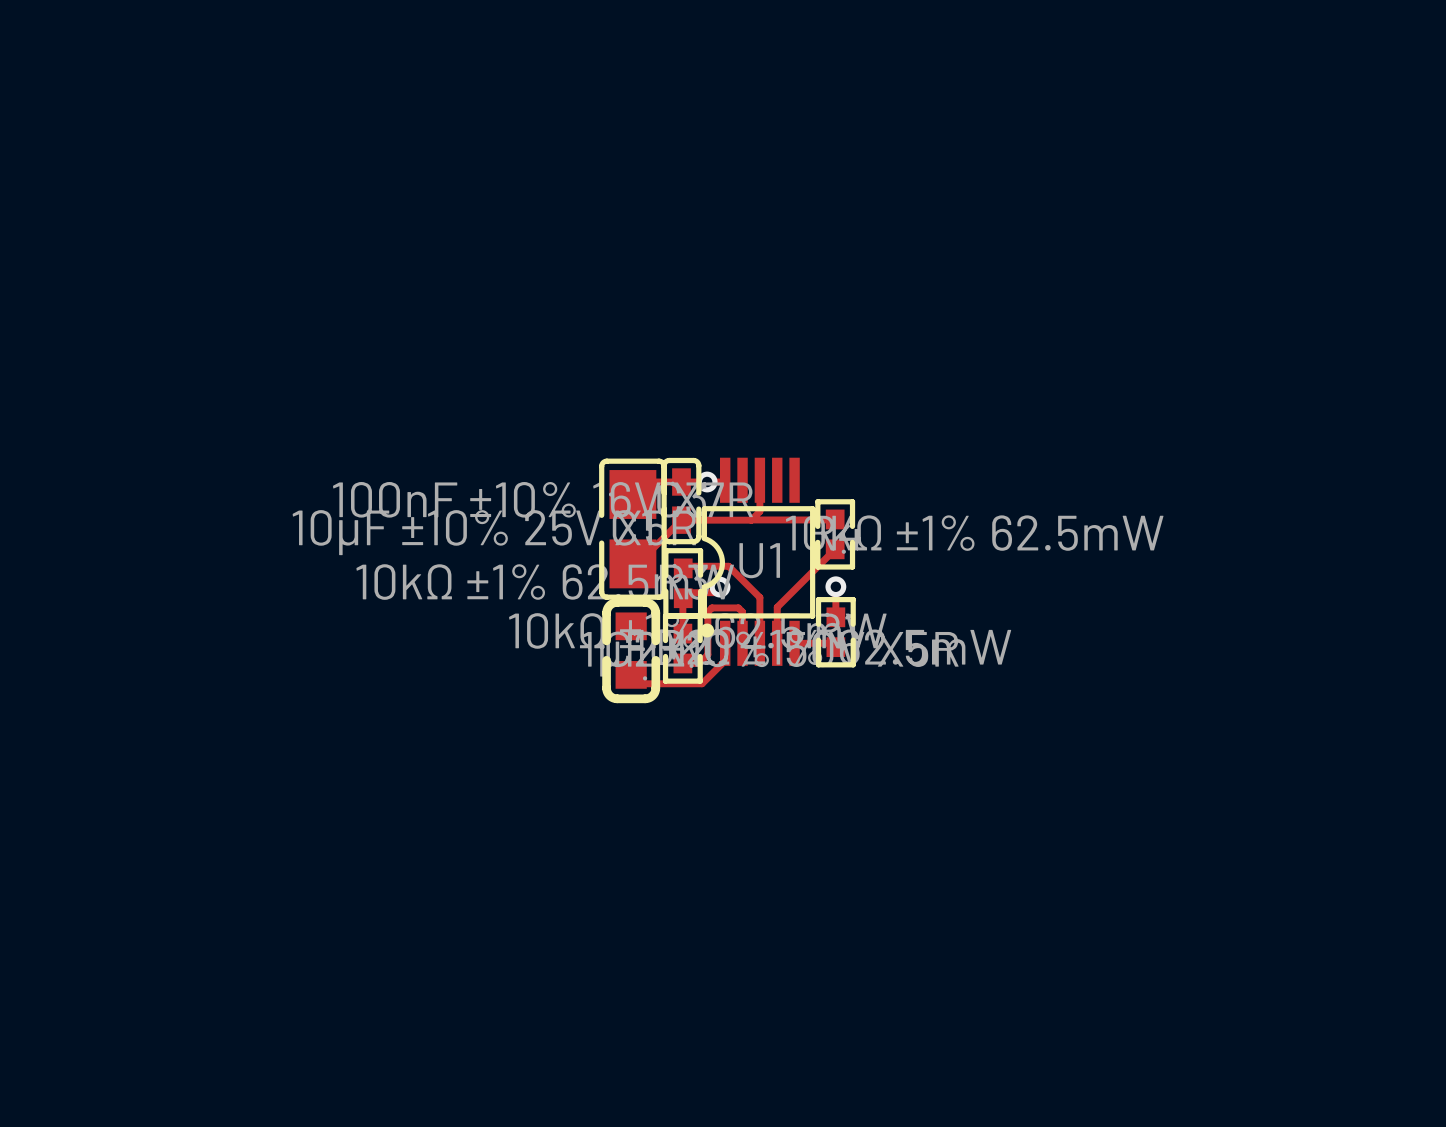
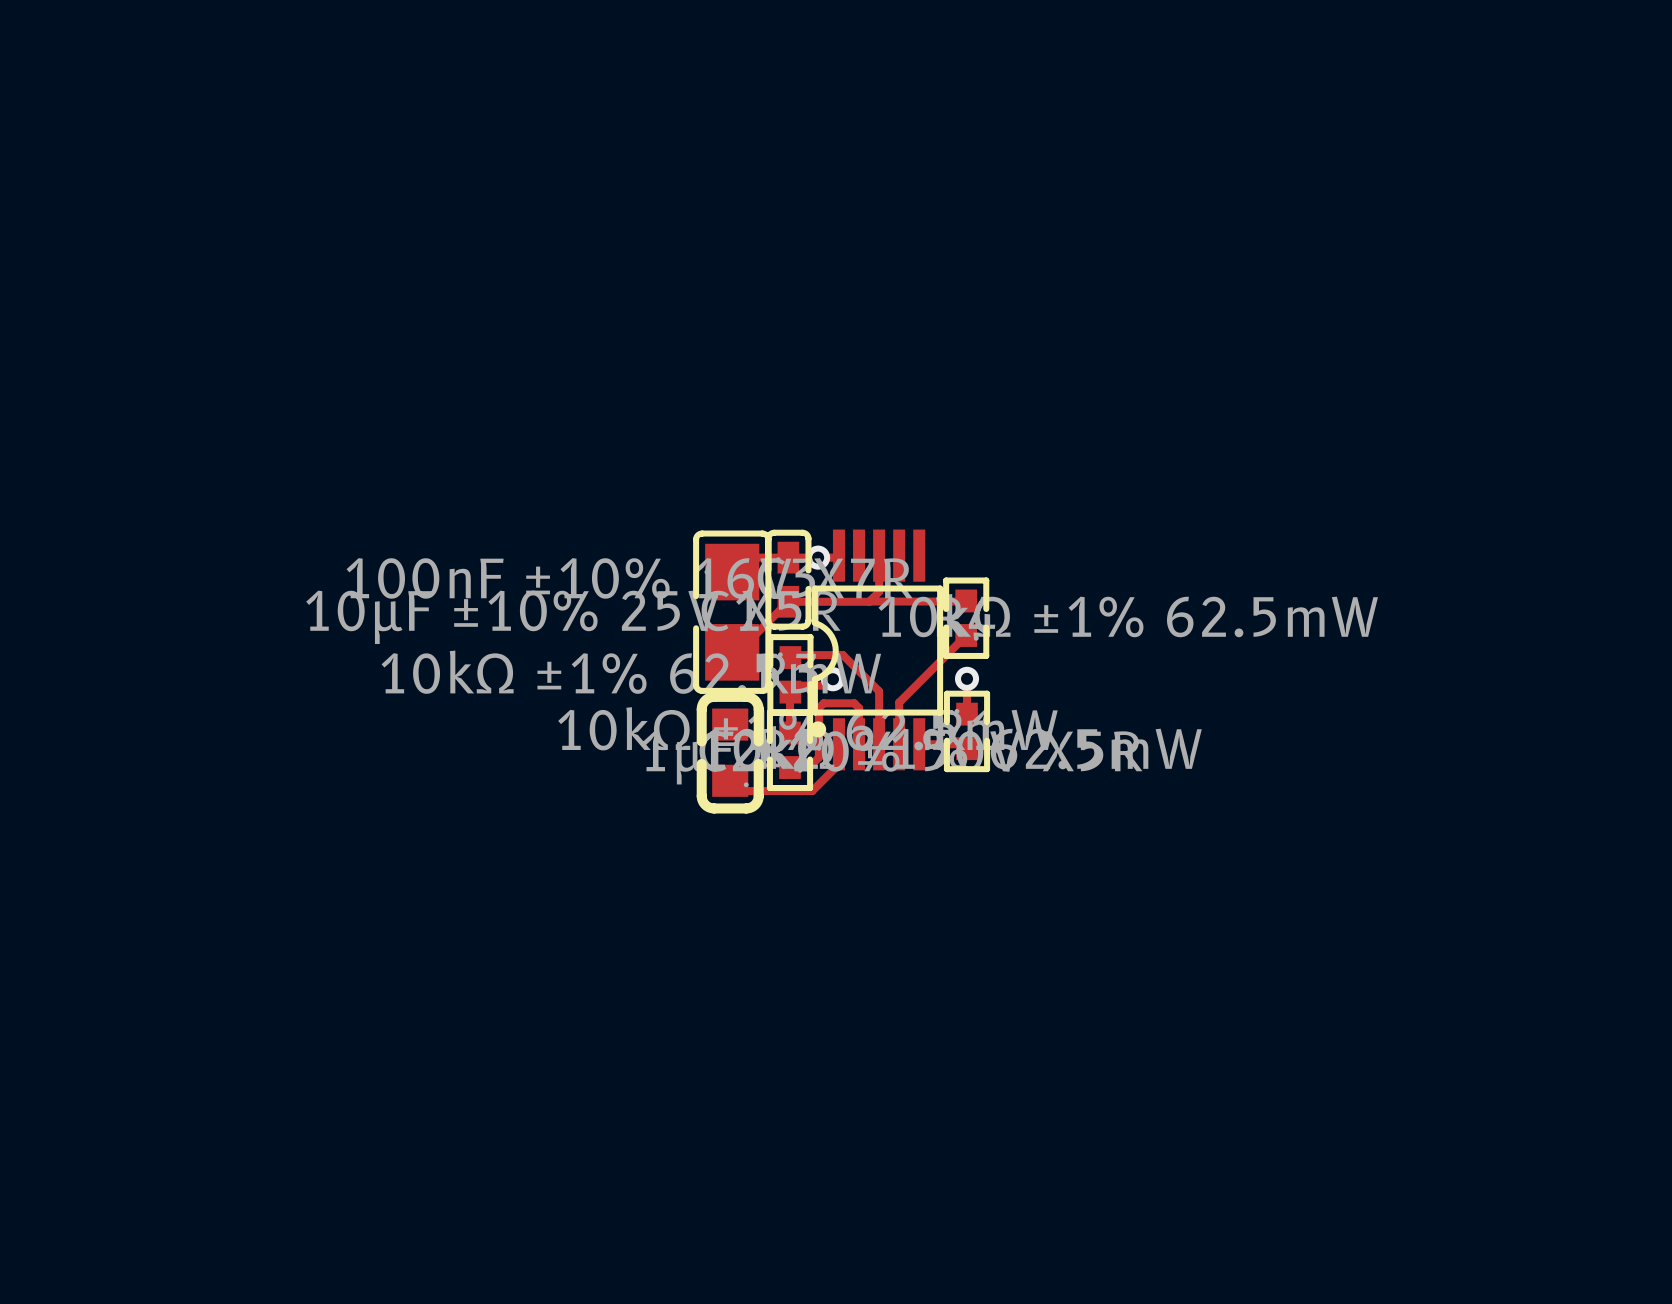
U1 name: U1 (759, 560) -> none

